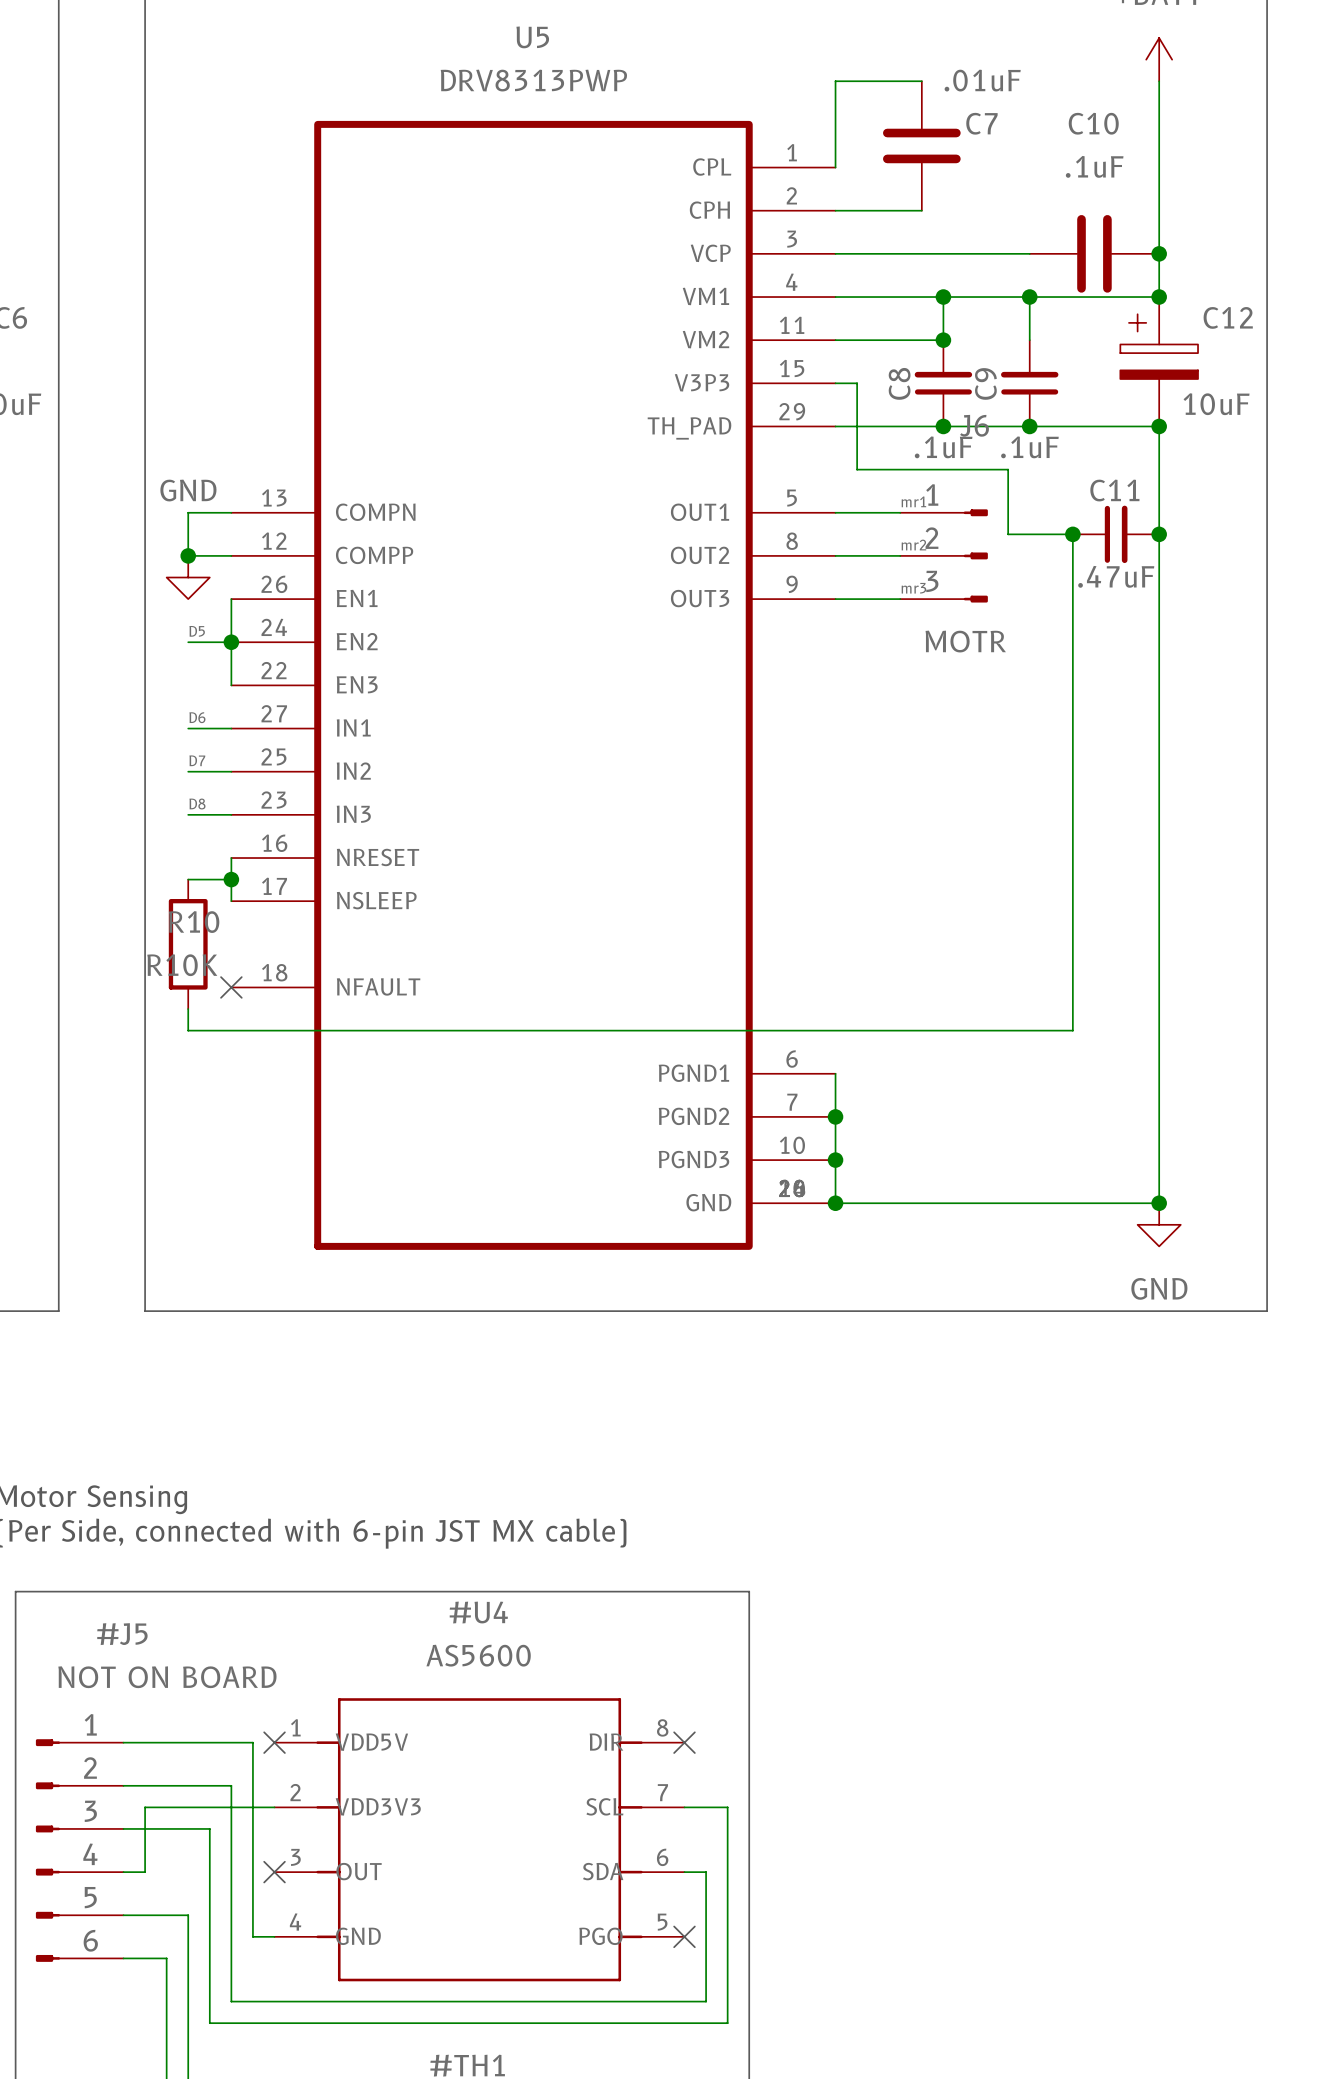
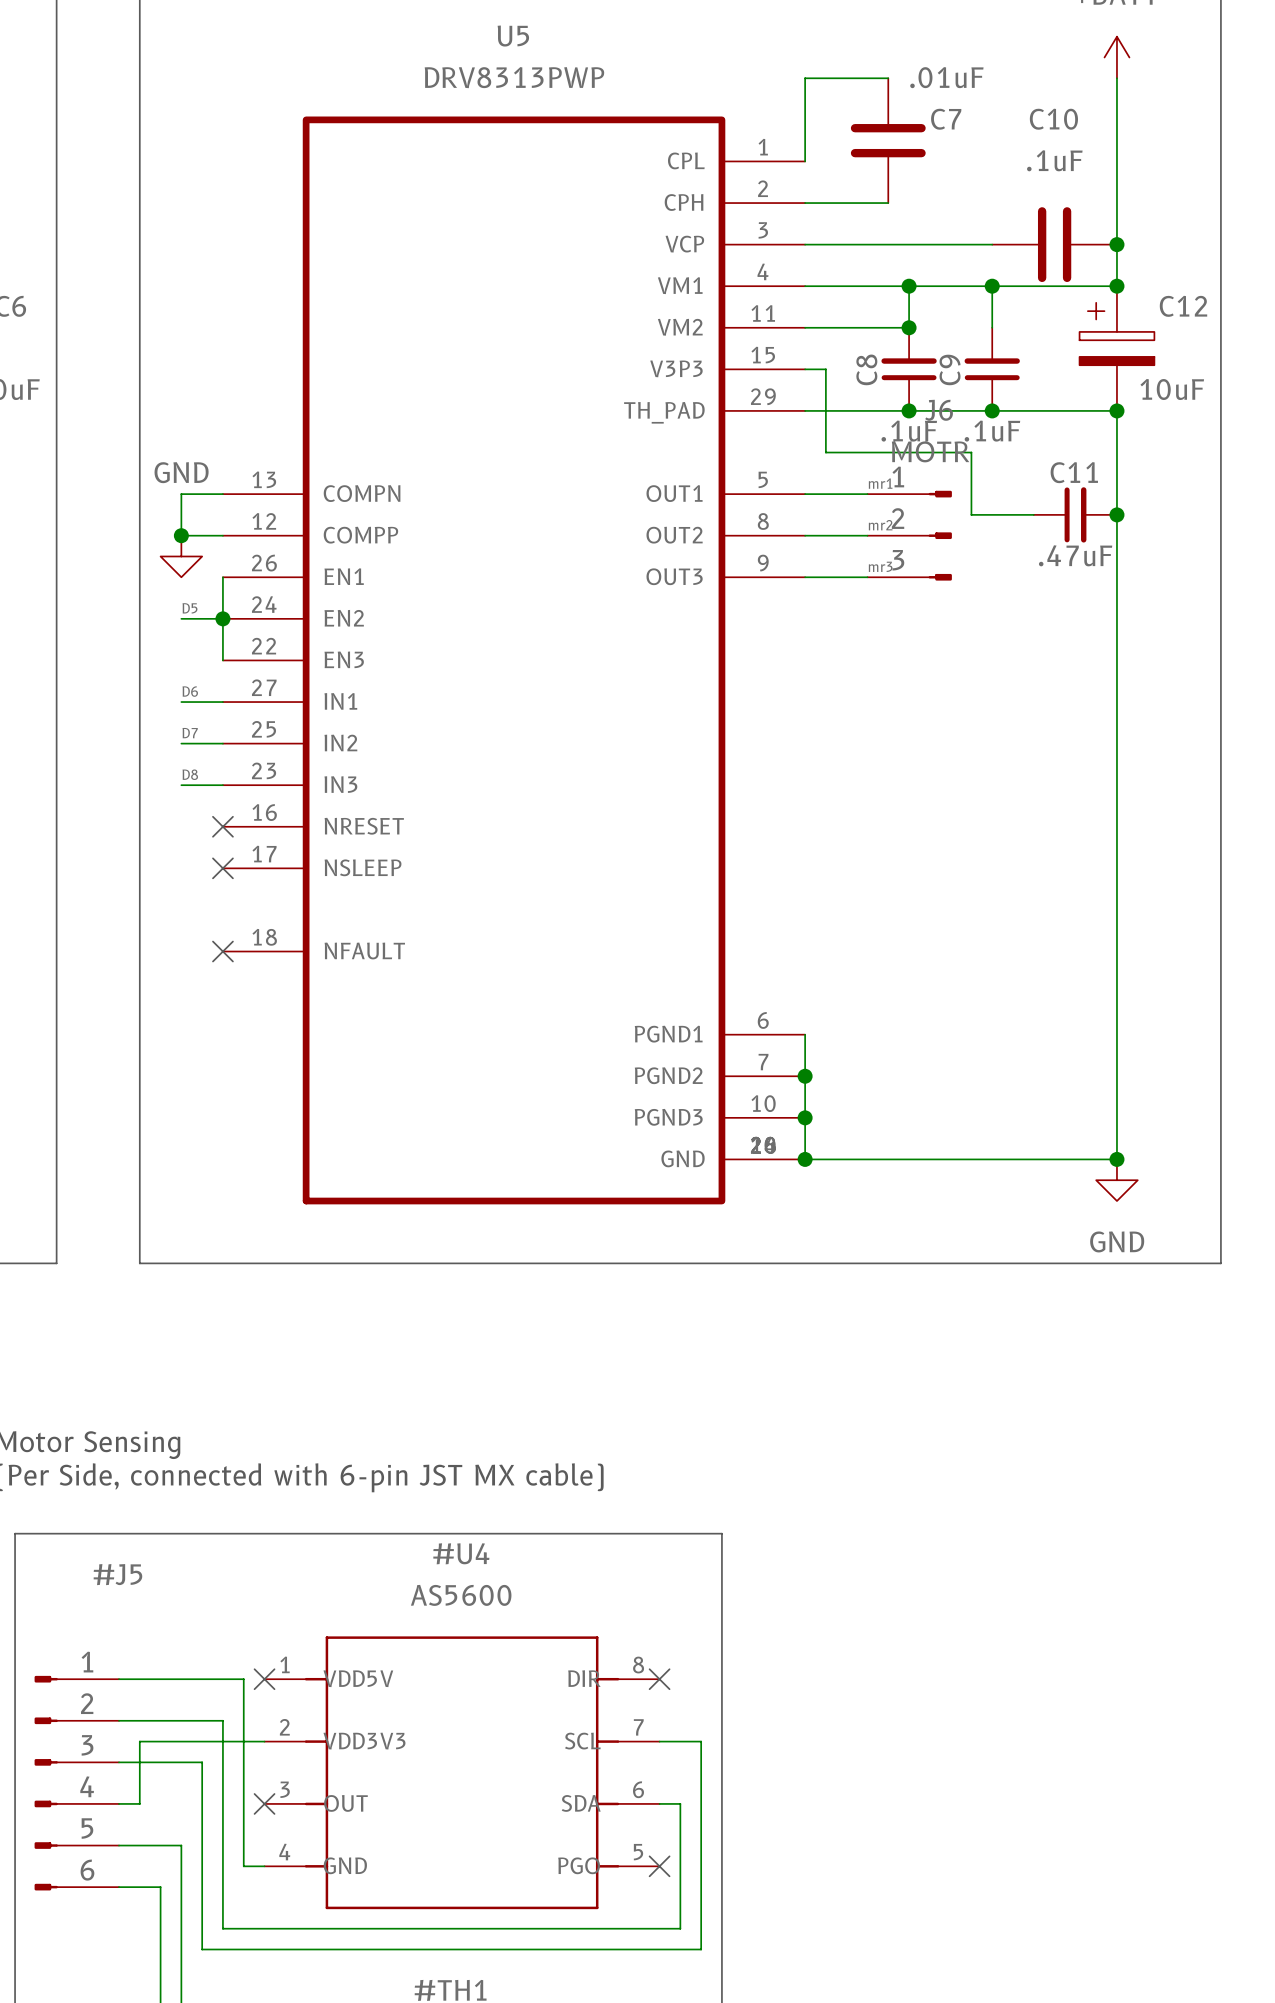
wire: (1072, 534) (1072, 1030) (188, 1030) (188, 1009) -> none
junction: (1072, 534) -> none
J6 value position: MOTR (965, 641) -> MOTR (930, 451)
wire: (231, 858) (231, 901) -> none
no-connect mark: none -> (222, 826)
wire: (188, 879) (231, 879) -> none
junction: (231, 879) -> none
no-connect mark: none -> (222, 868)
R10: R10K (188, 944) -> none
#J5 text: NOT ON BOARD (167, 1677) -> none

